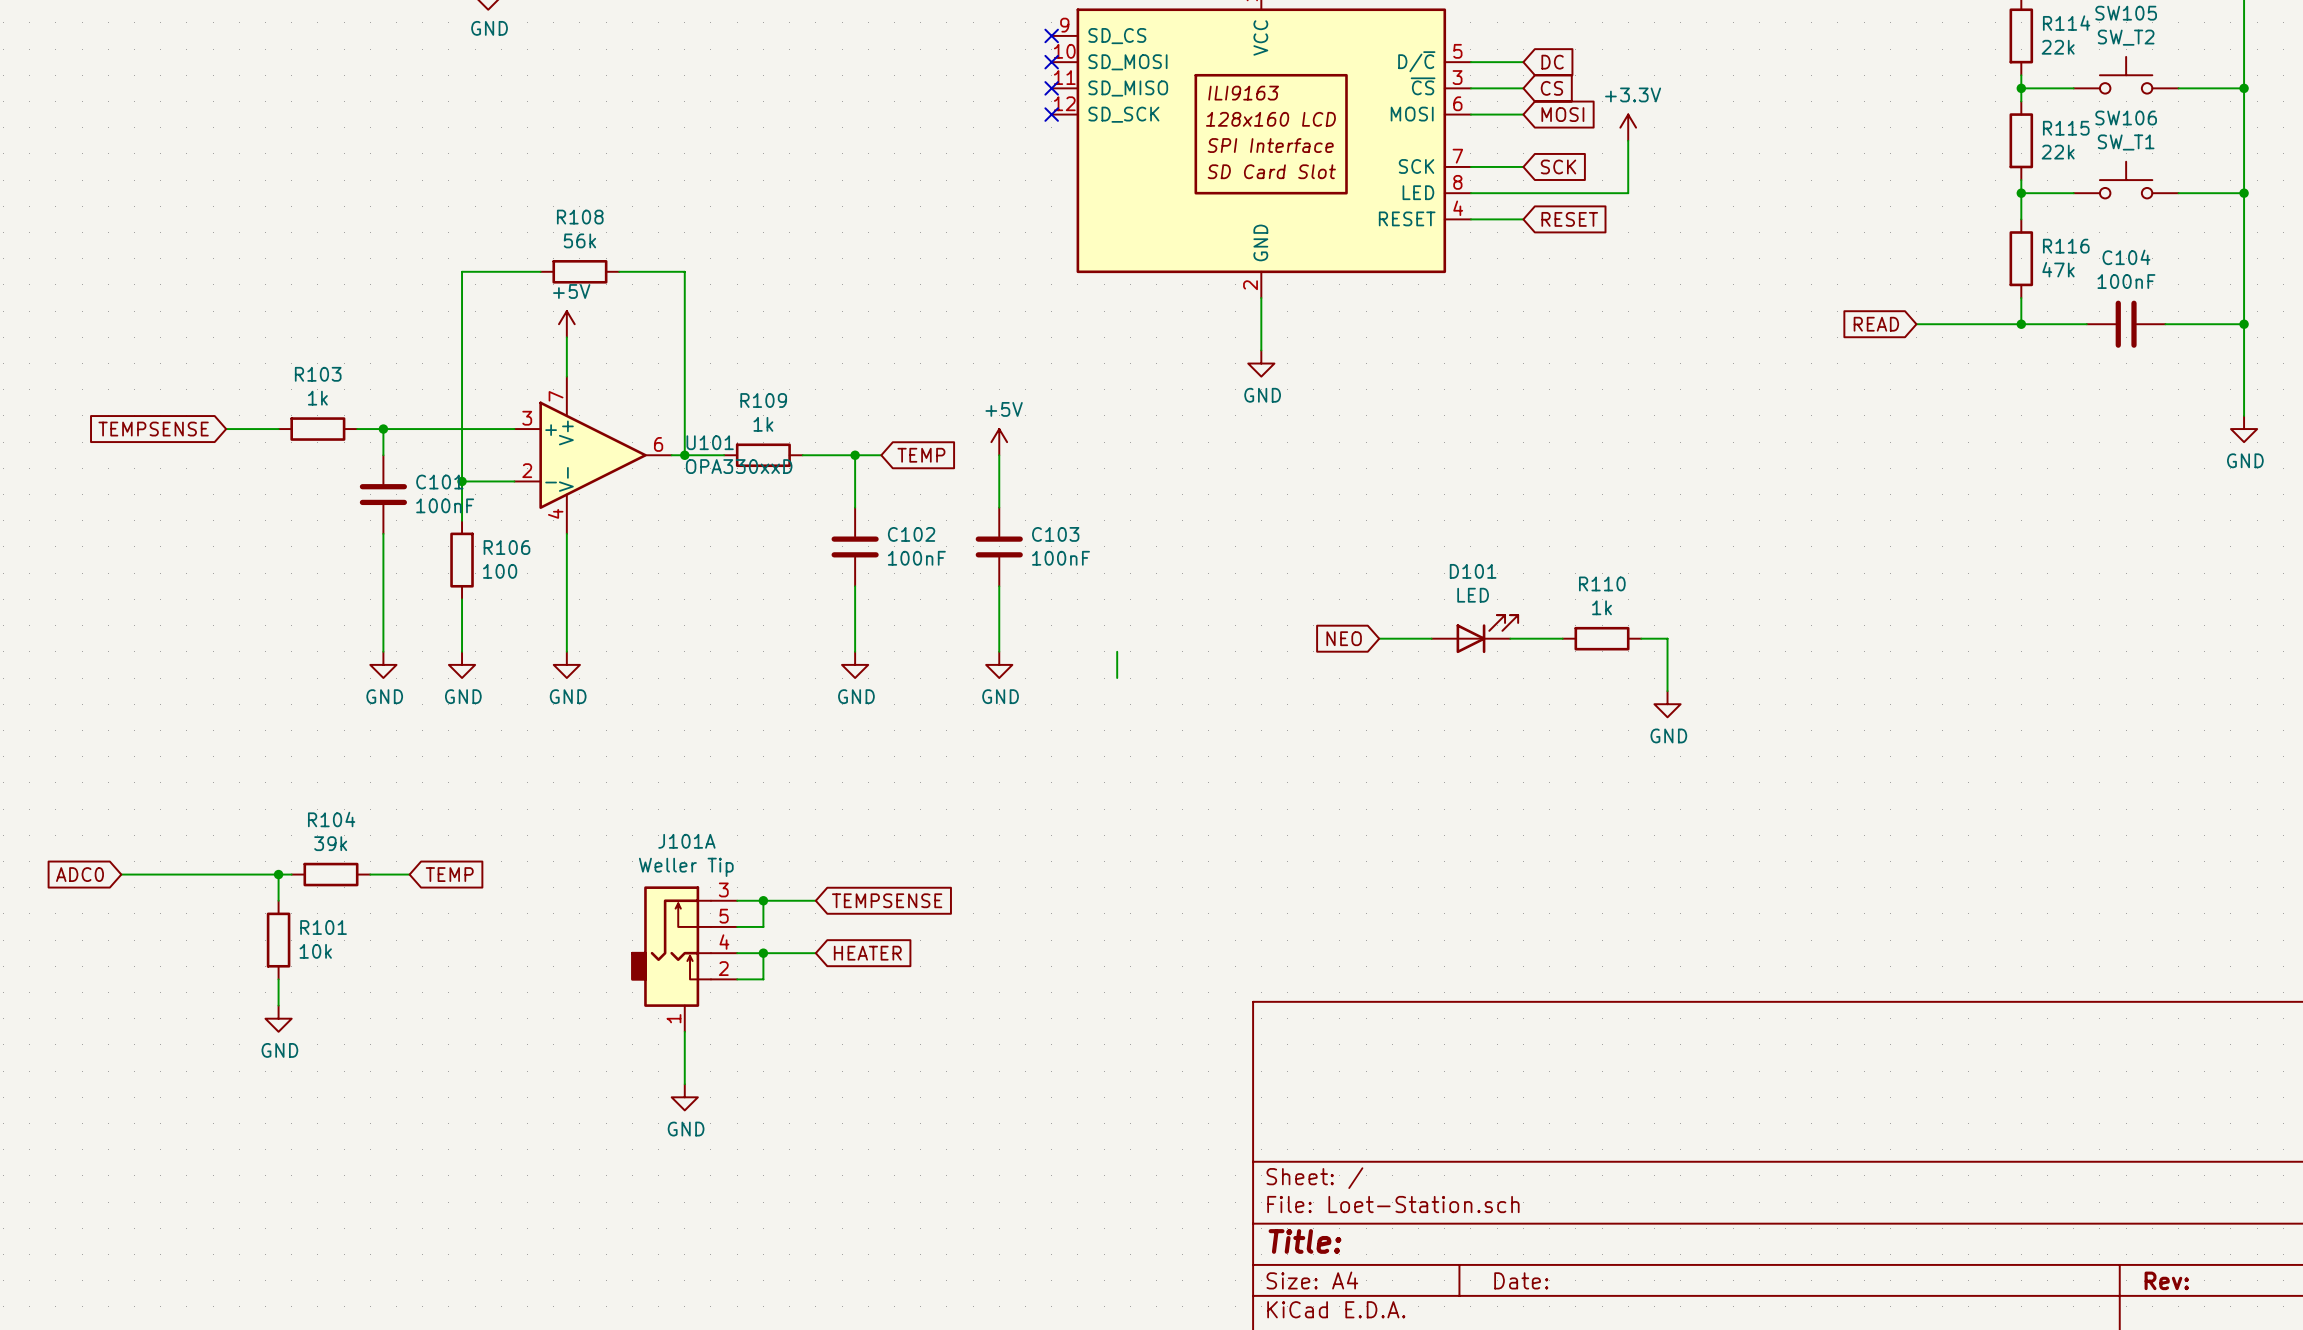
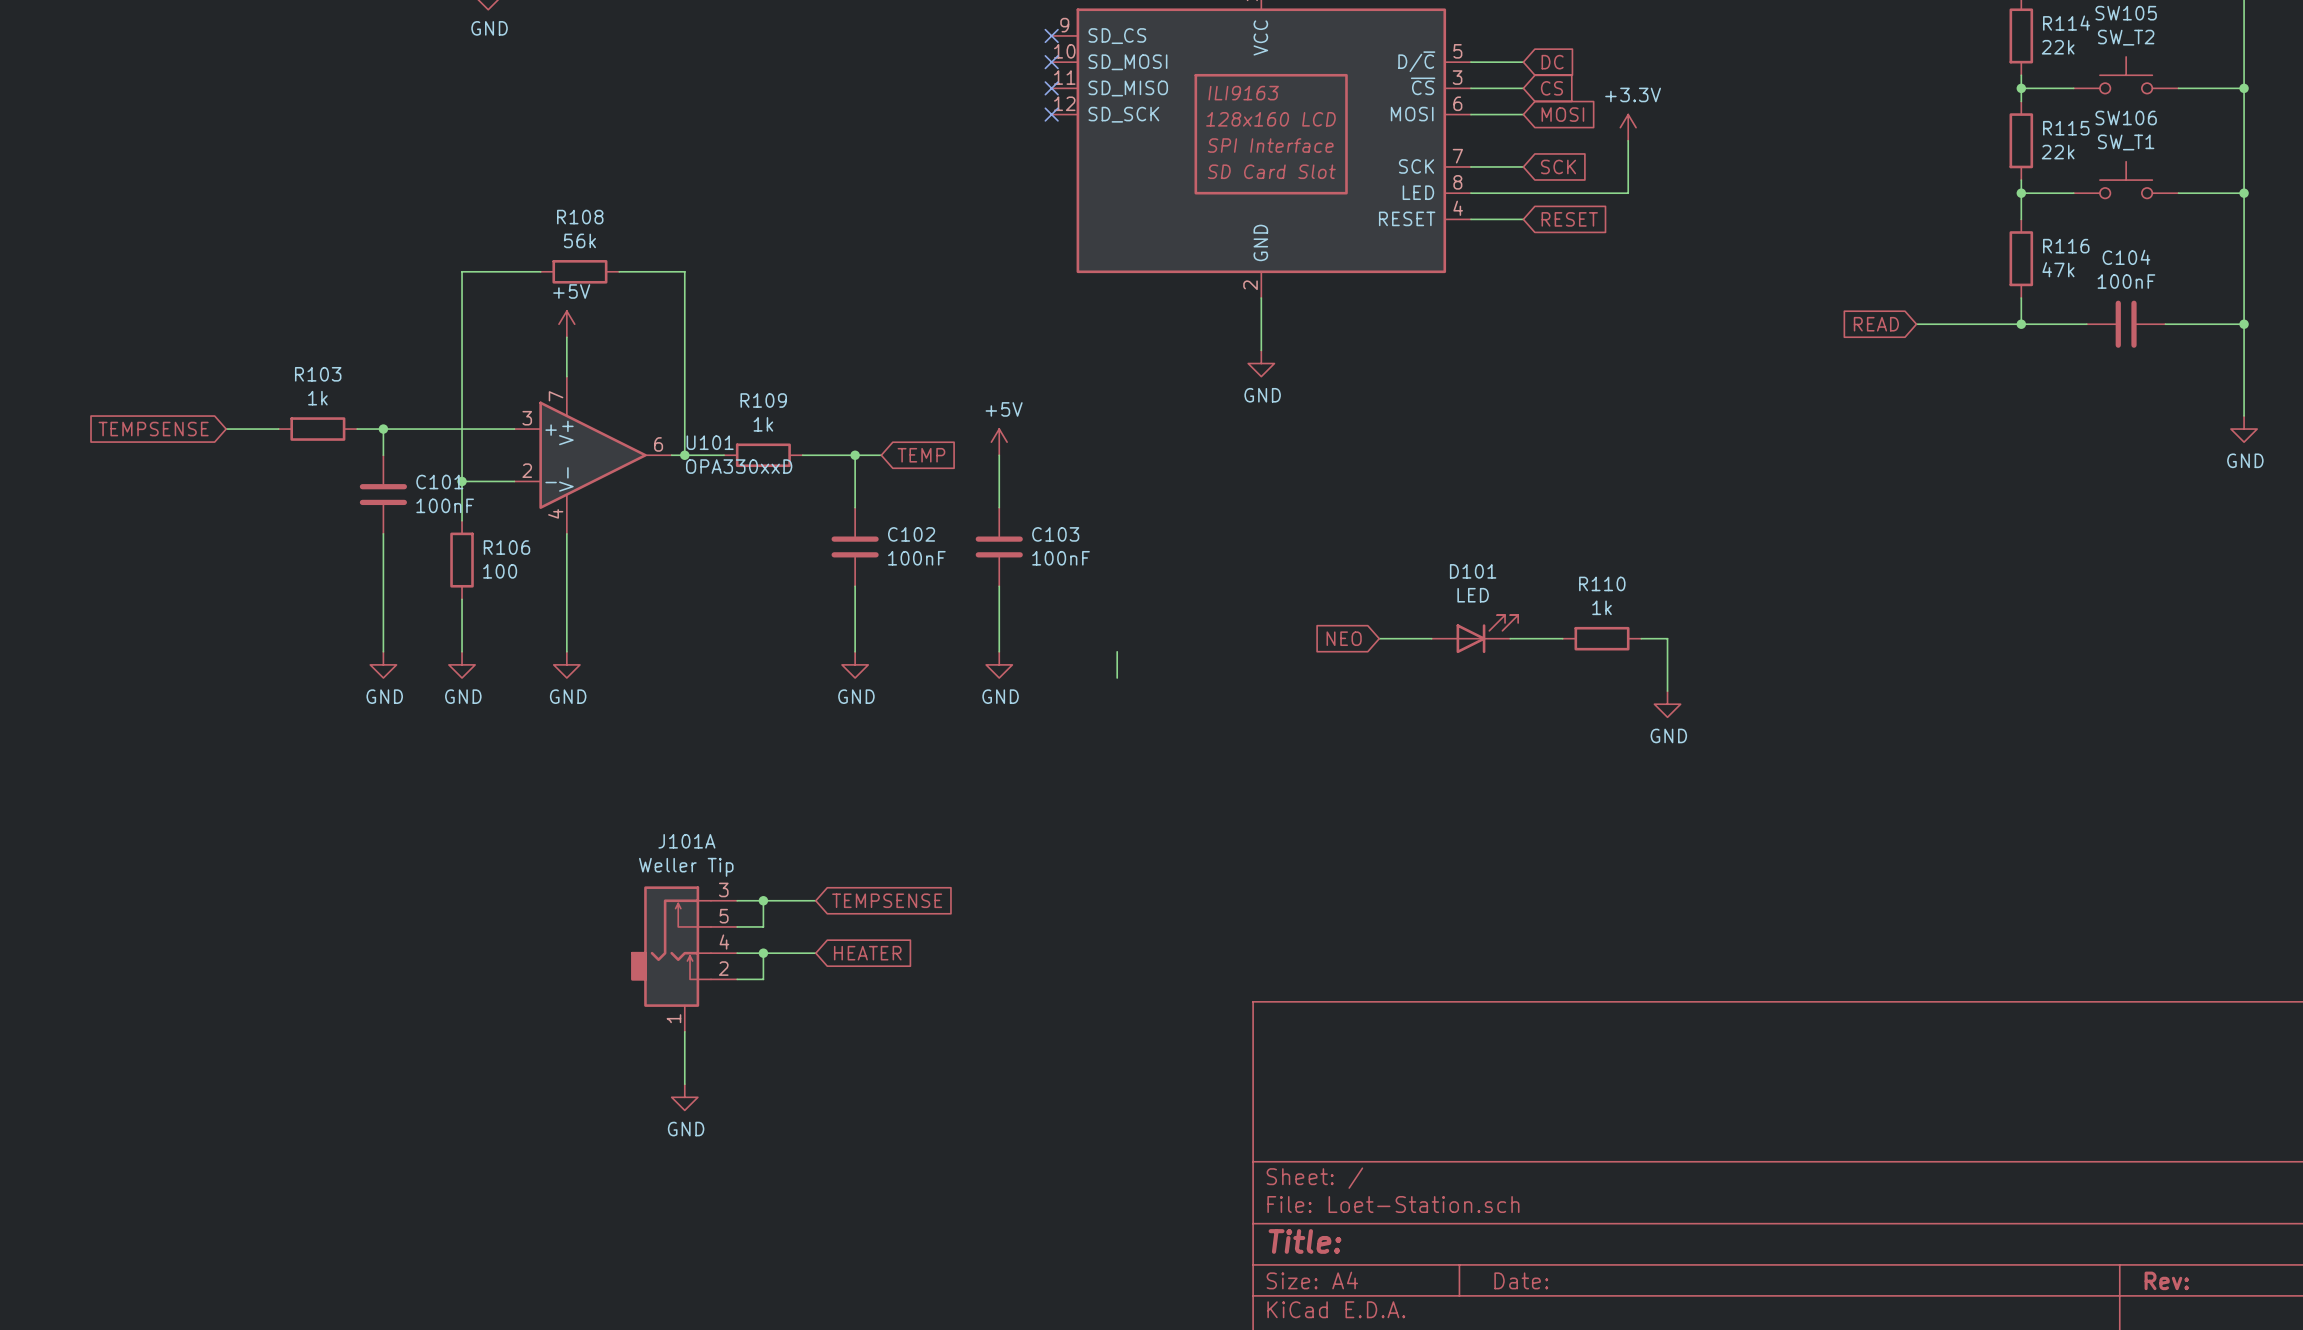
global label: ADC0 (79, 874) -> none
wire: (121, 874) (291, 874) -> none
wire: (278, 874) (278, 900) -> none
junction: (278, 874) -> none
R104: 39k (330, 874) -> none
wire: (370, 874) (409, 874) -> none
global label: TEMP (449, 874) -> none
R101: 10k (278, 940) -> none
wire: (278, 979) (278, 1005) -> none
power symbol: GND (278, 1018) -> none

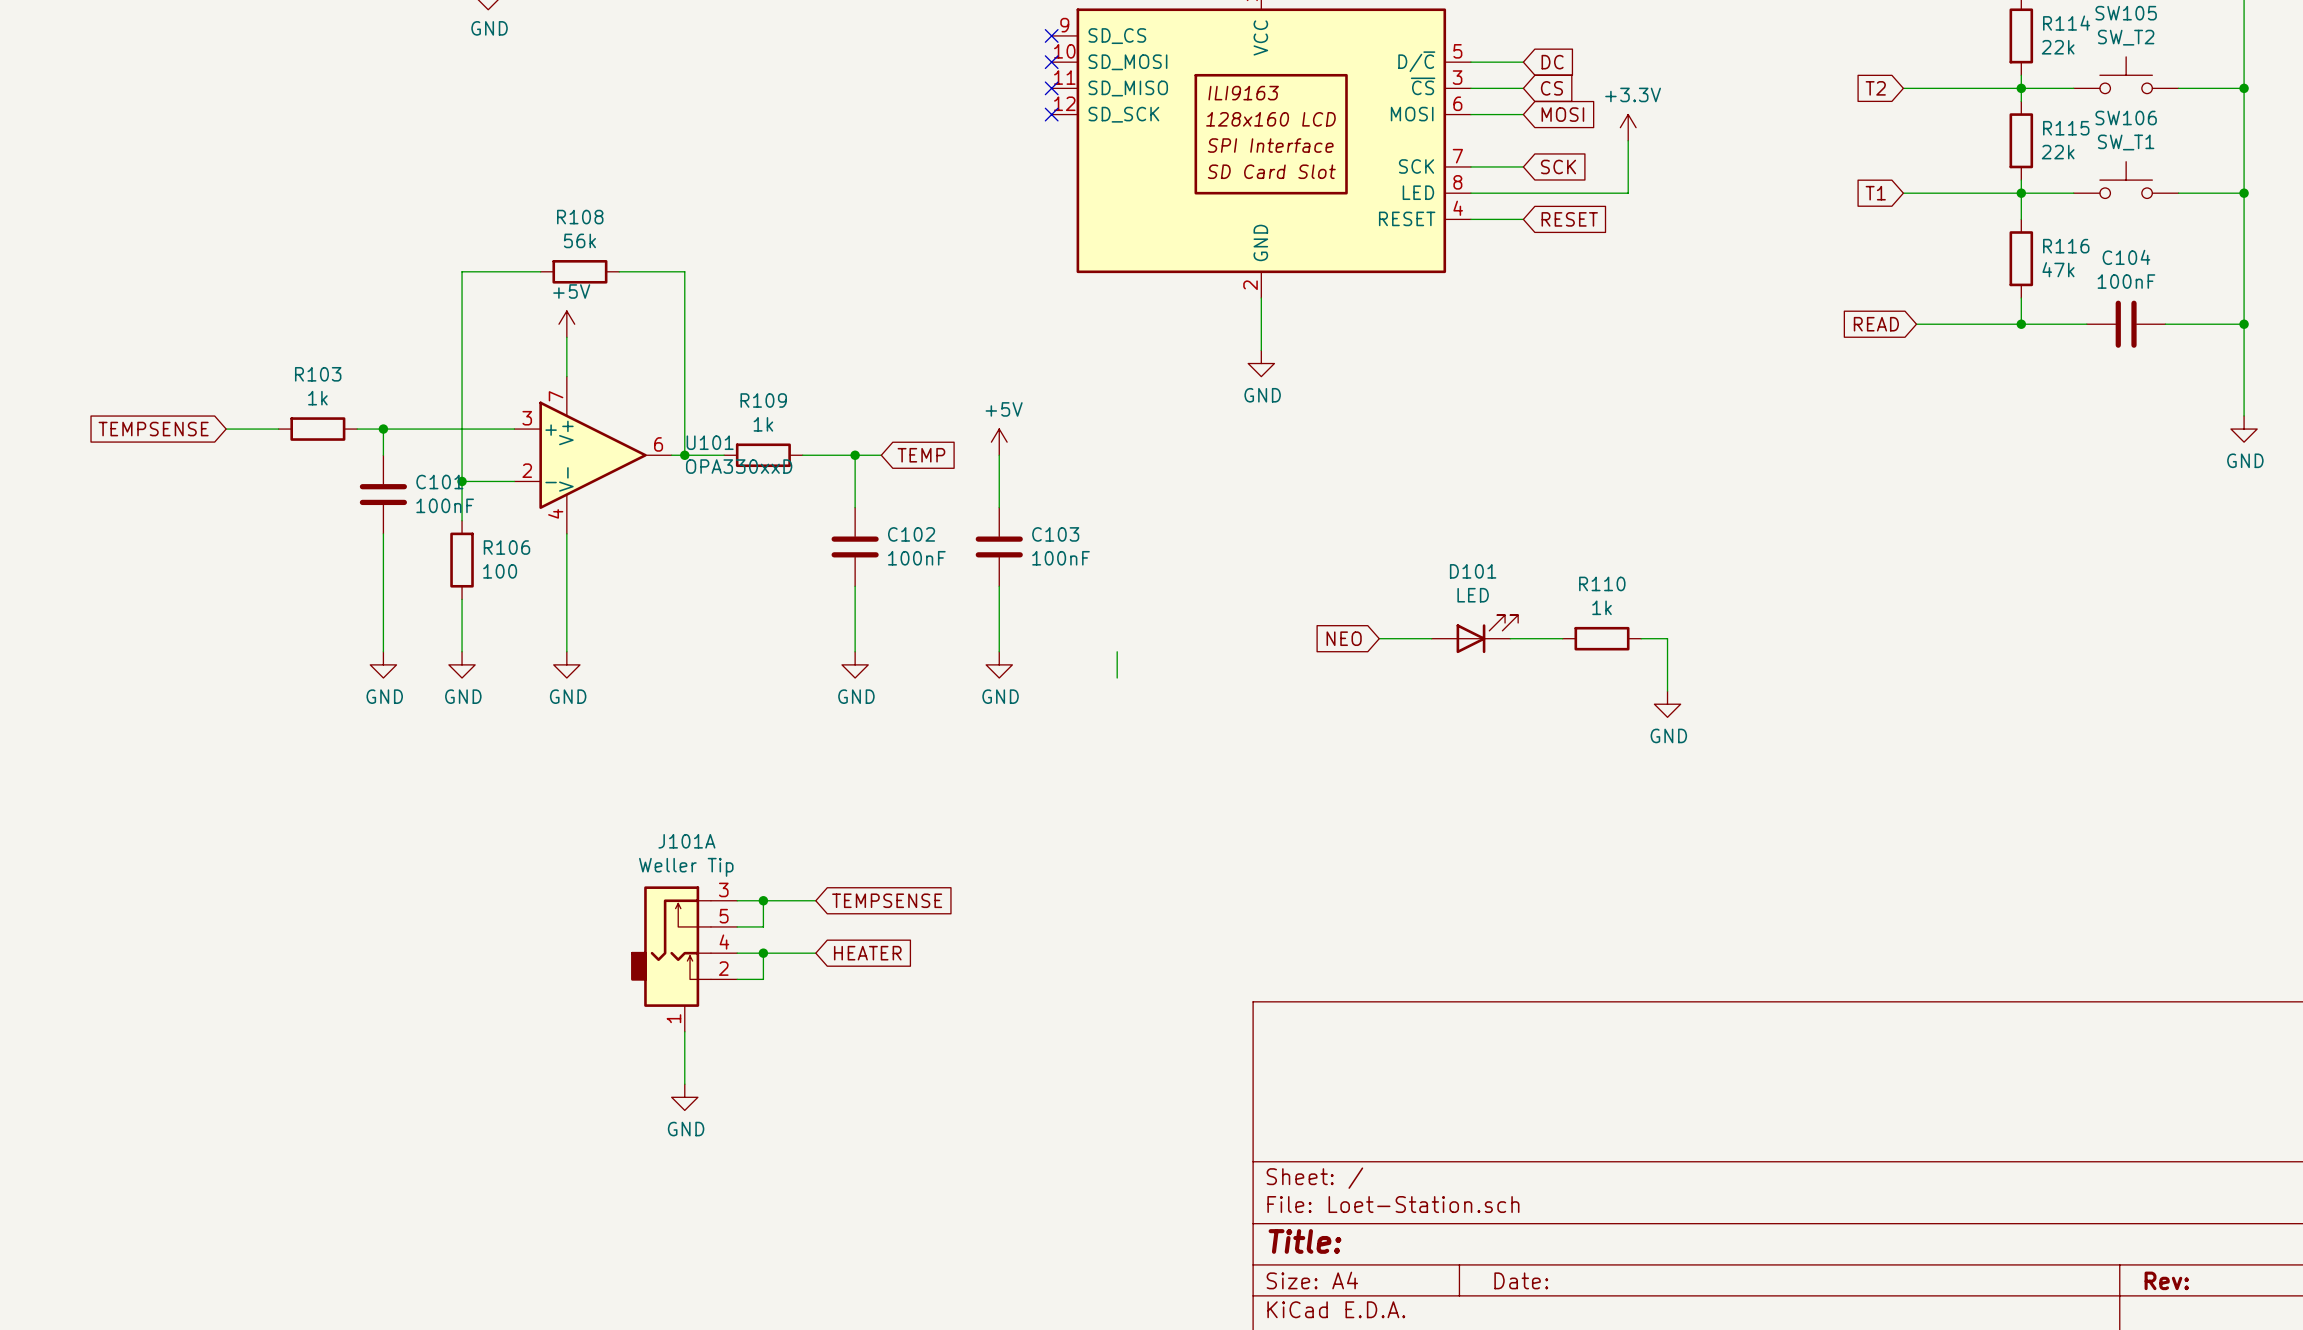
global label: none -> T2 (1875, 88)
wire: none -> (1903, 88) (2021, 88)
global label: none -> T1 (1875, 193)
wire: none -> (1903, 193) (2021, 193)

